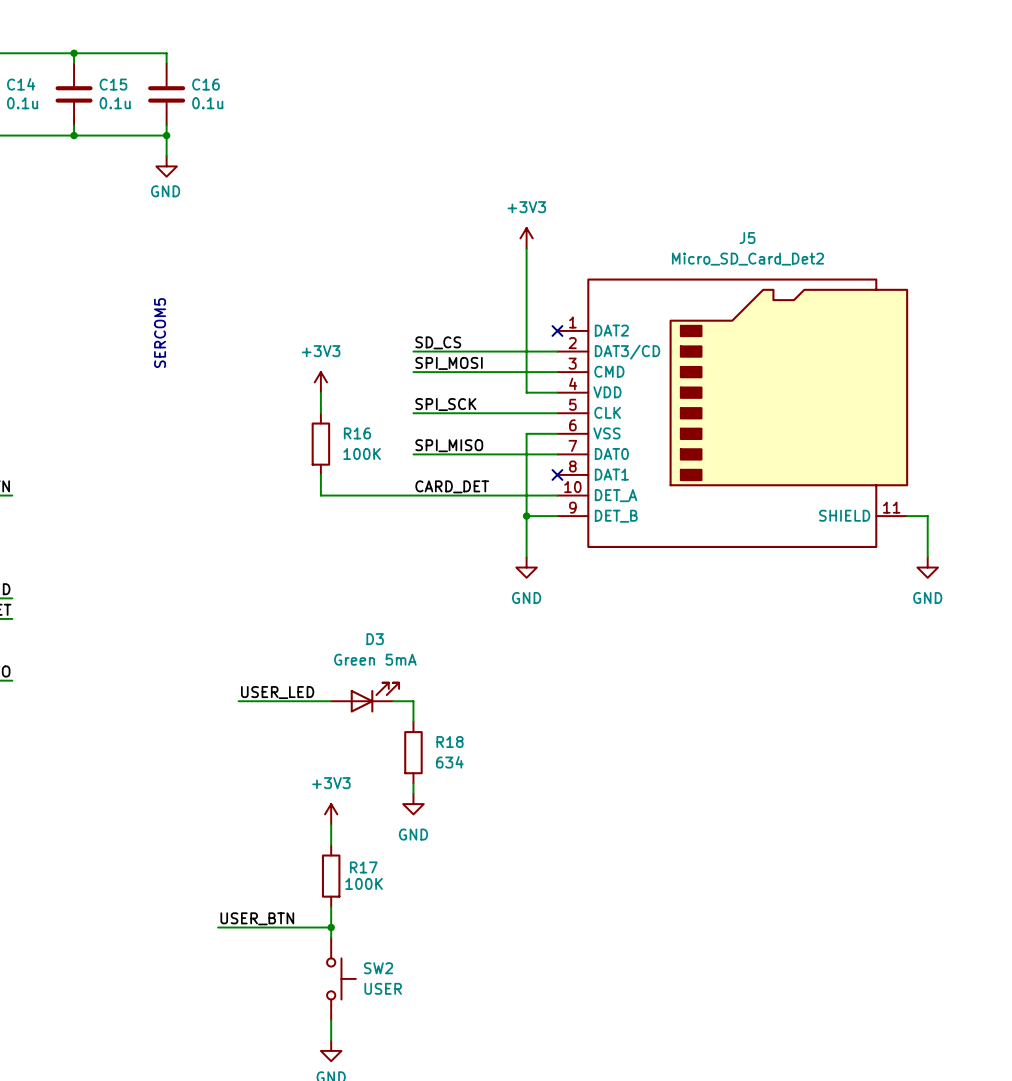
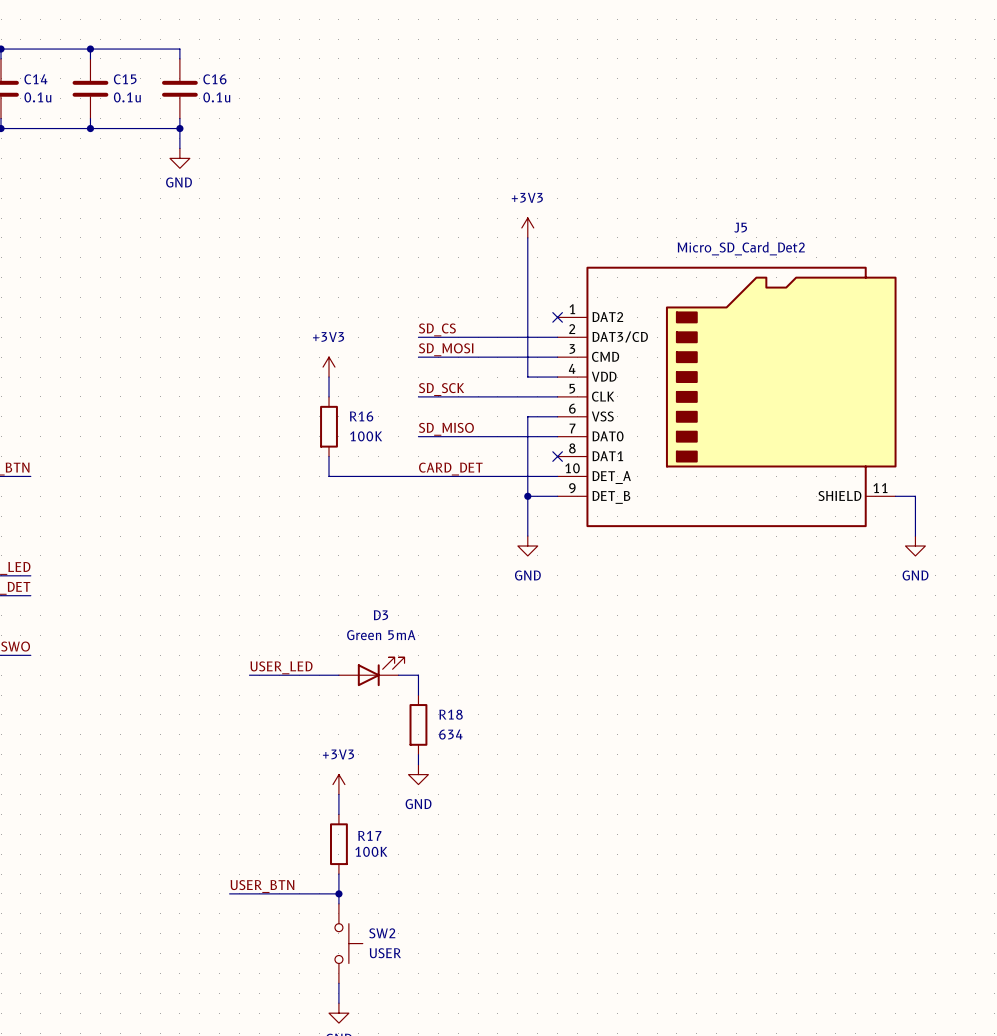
text: SERCOM5 (160, 333) -> none
label: SPI_MOSI (449, 363) -> SD_MOSI (446, 349)
label: SPI_SCK (445, 404) -> SD_SCK (441, 389)
label: SPI_MISO (449, 445) -> SD_MISO (446, 429)

